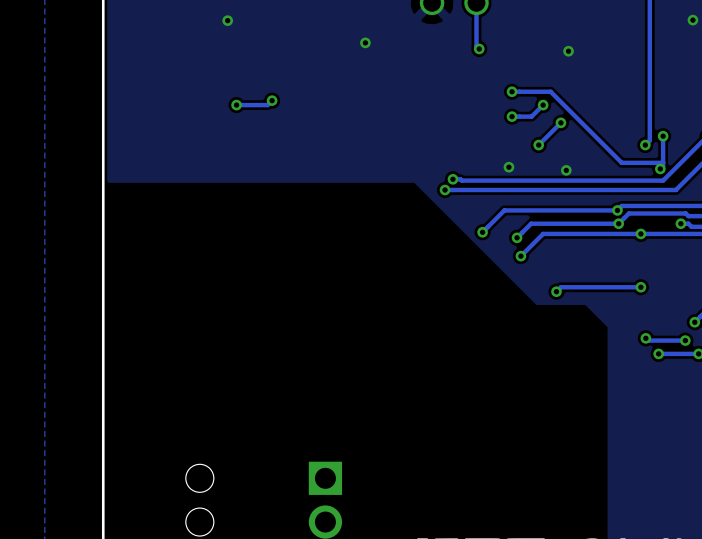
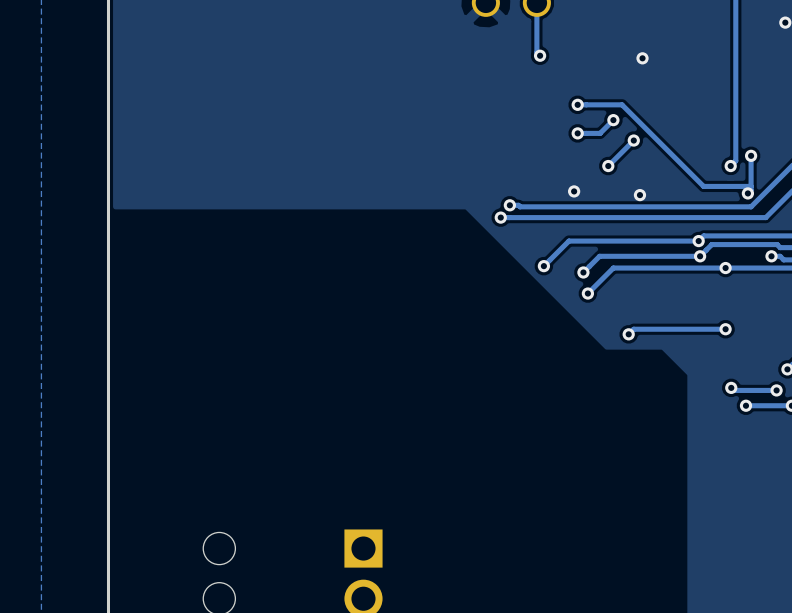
via: (227, 20) -> none
via: (365, 42) -> none
track: (272, 100) (267, 105) (236, 105) -> none
via: (272, 100) -> none
via: (236, 105) -> none

